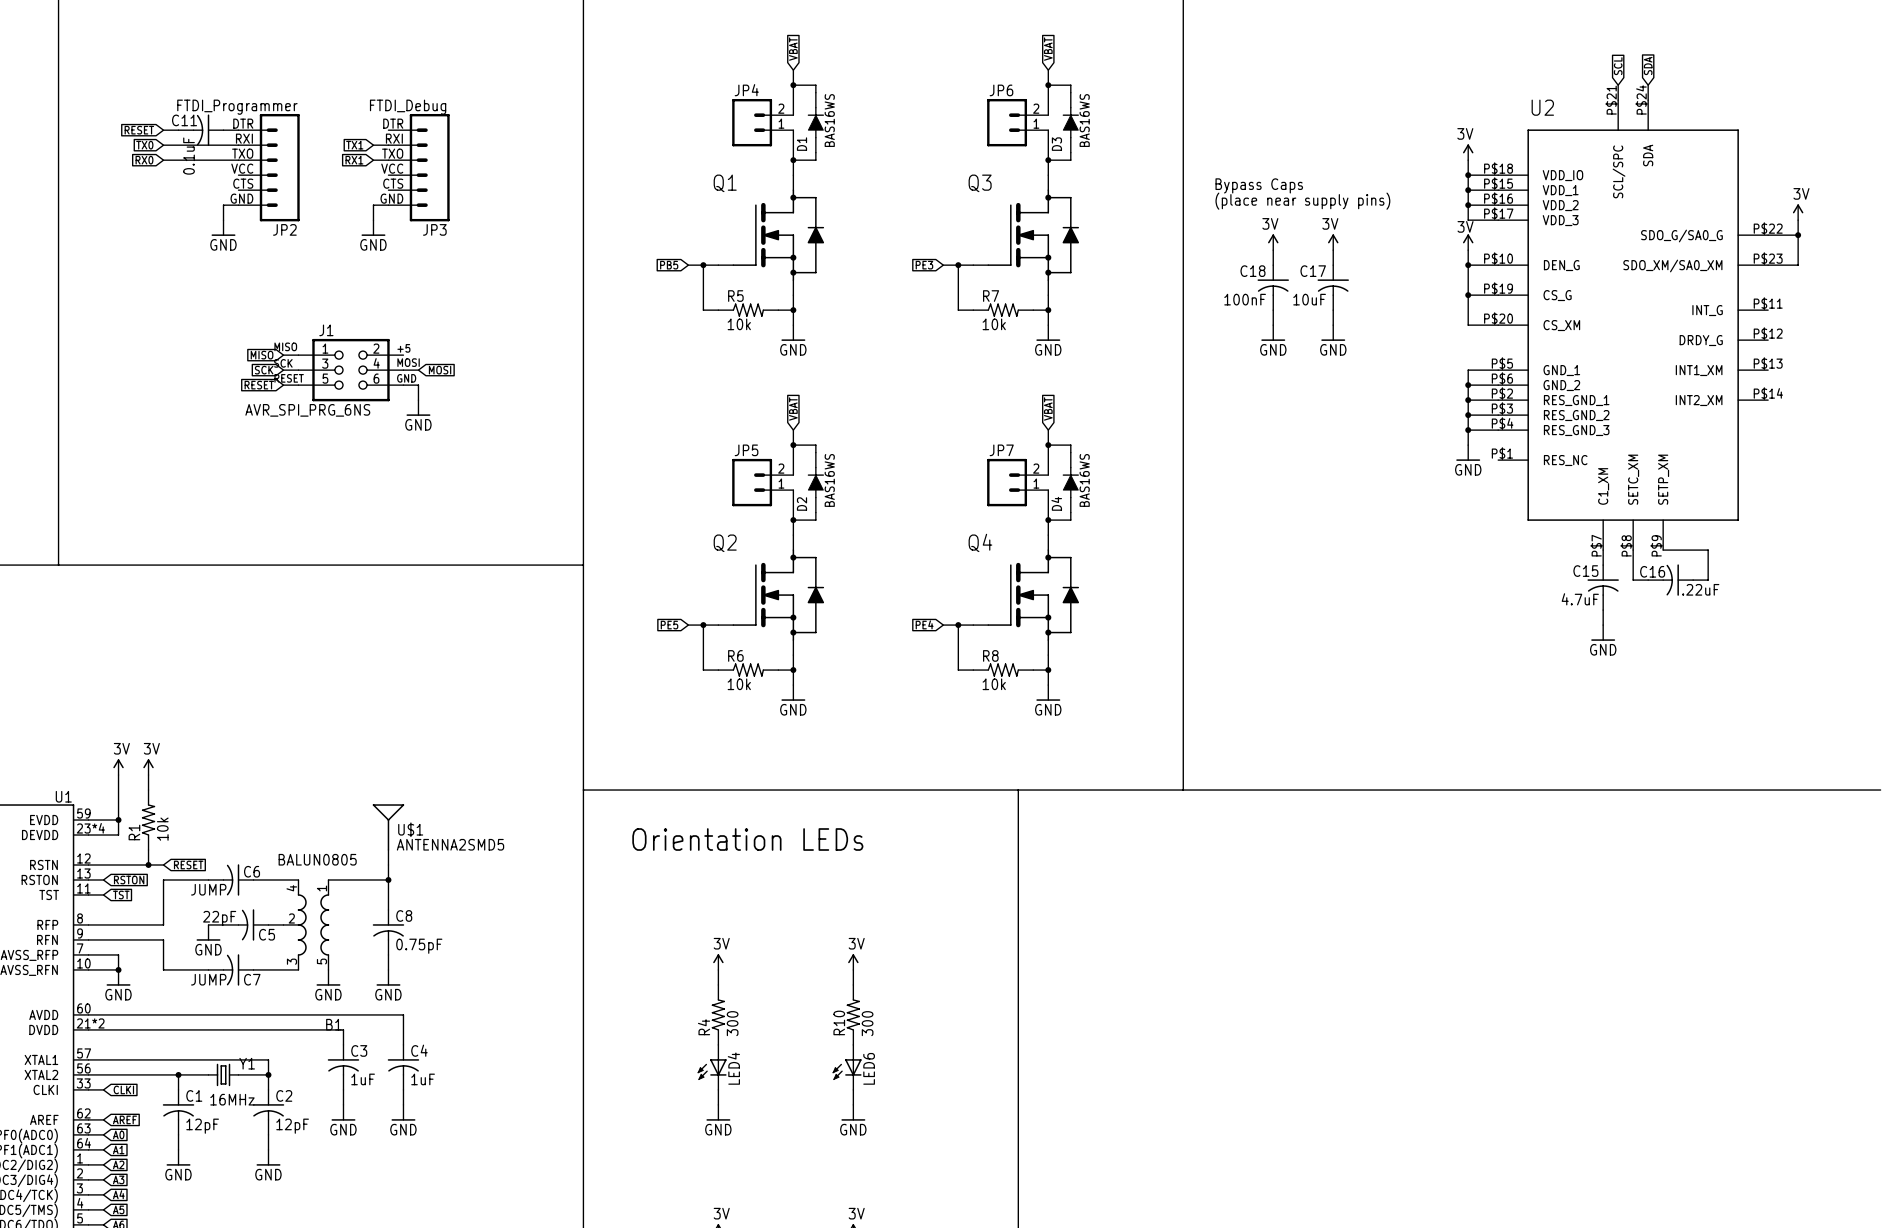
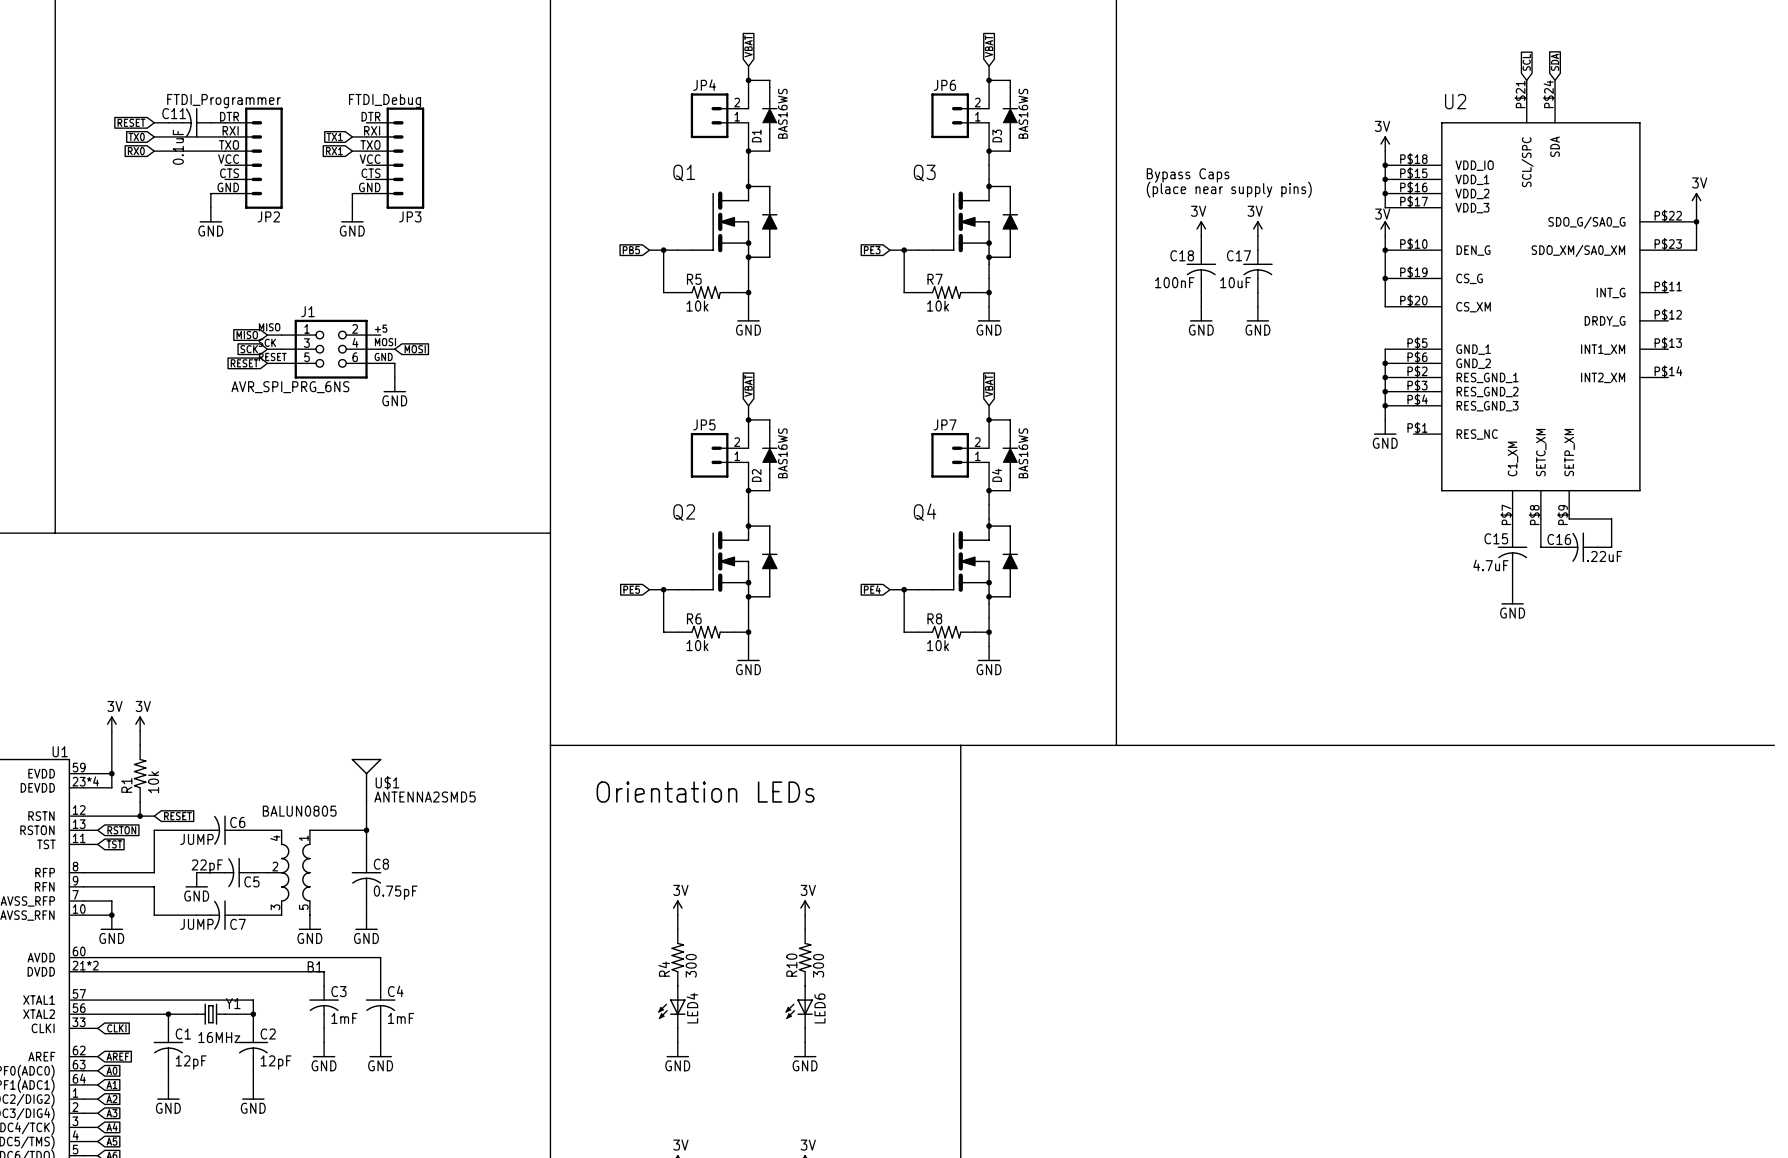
C3 value: 1uF (363, 1079) -> 1mF (344, 1018)
C4 value: 1uF (423, 1079) -> 1mF (401, 1018)

